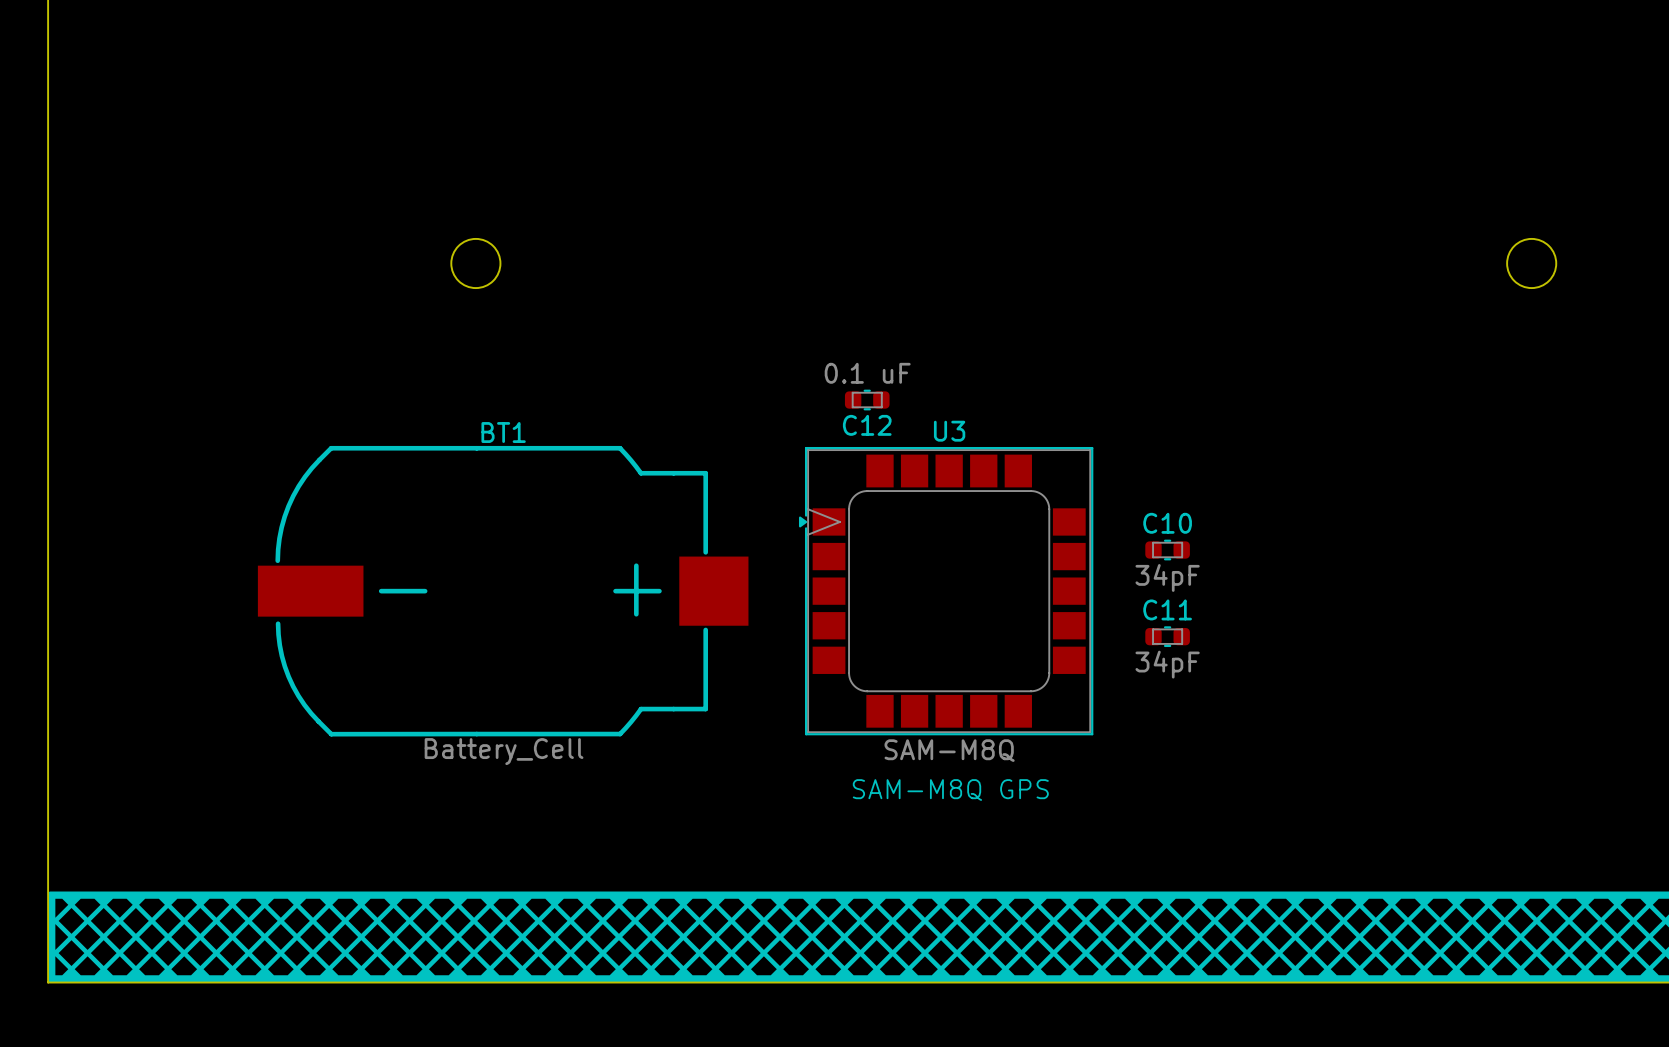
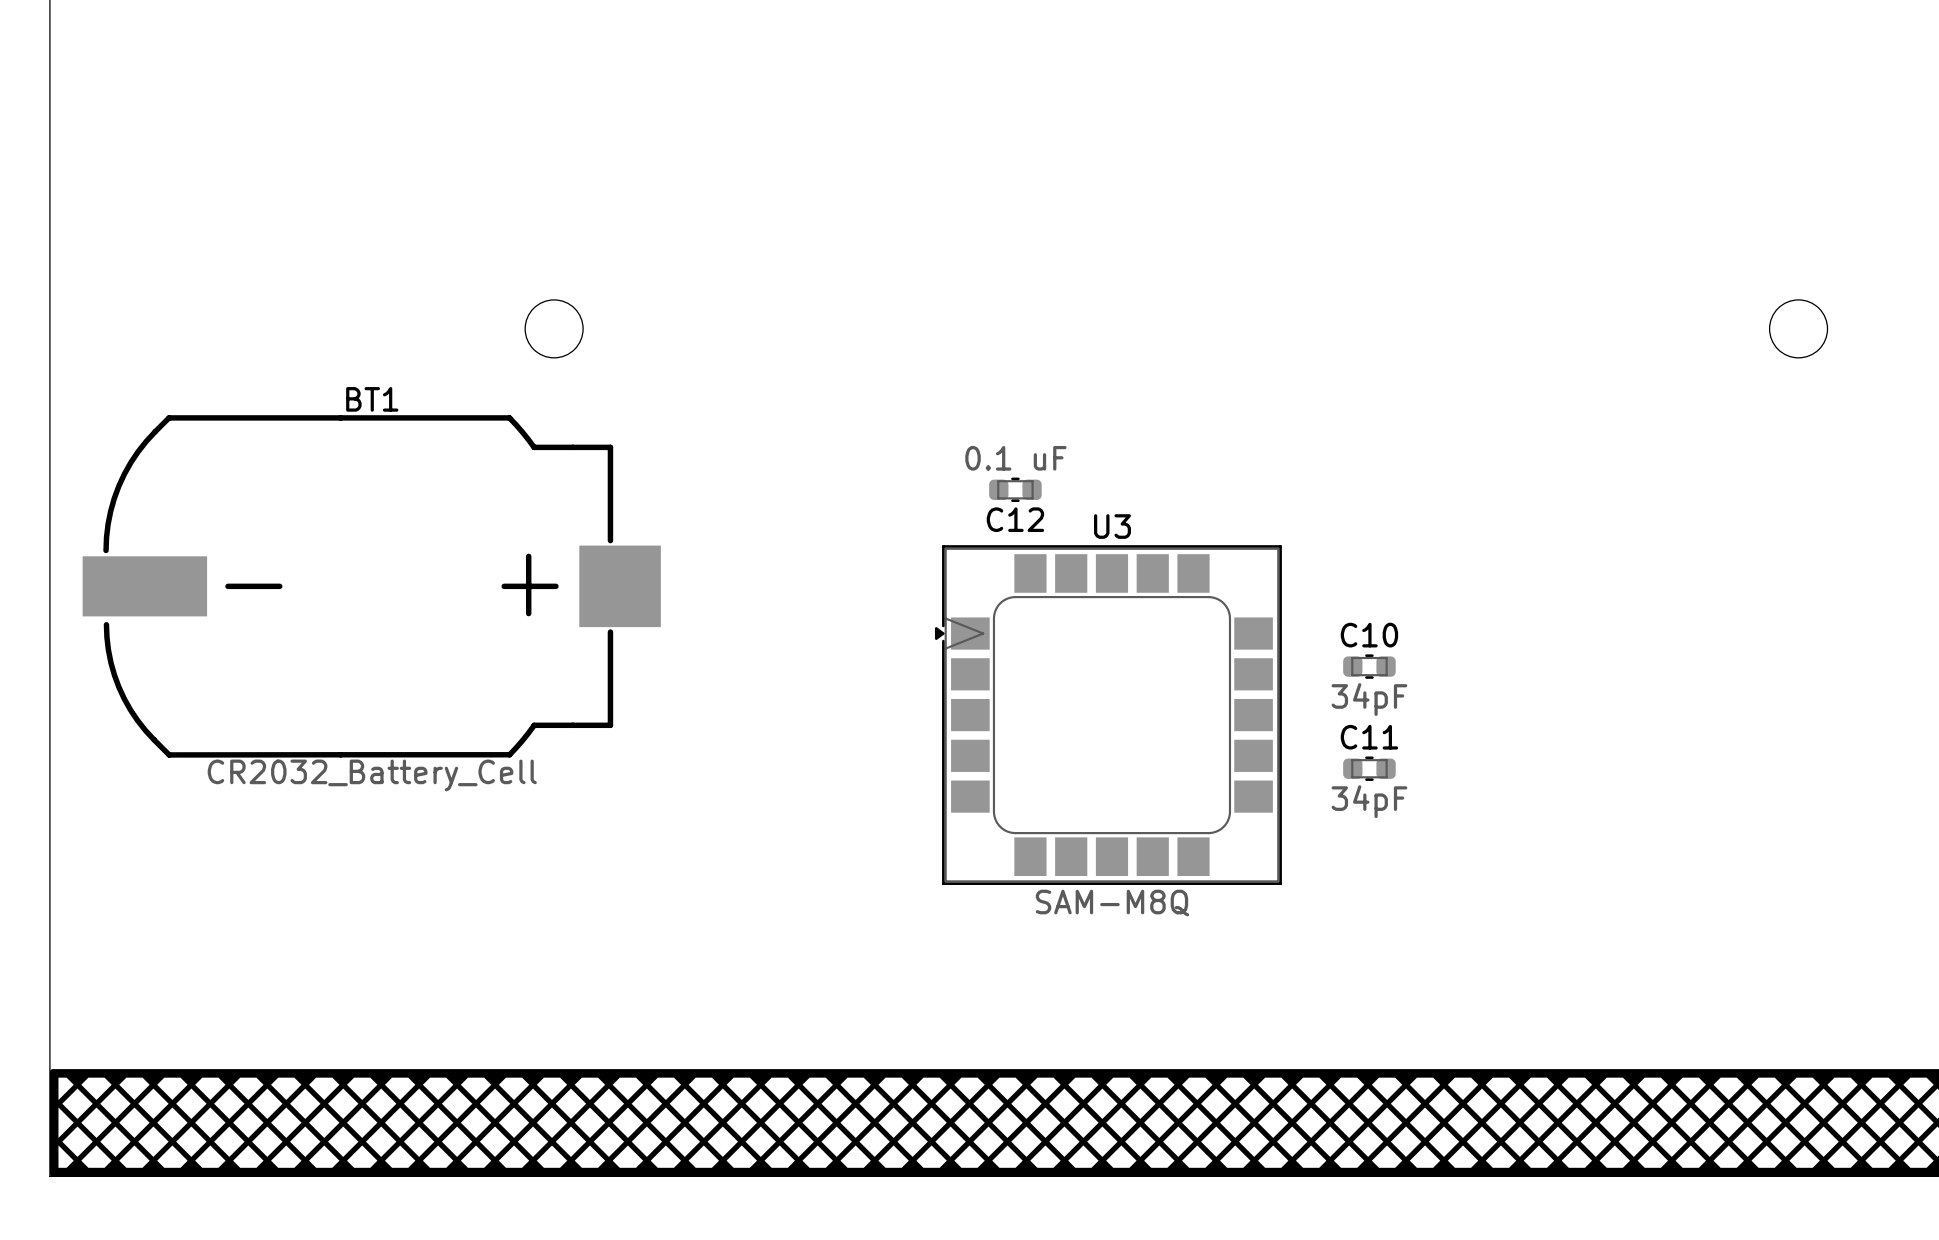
BT1 position: (503, 591) -> (371, 586)
BT1 value: Battery_Cell (504, 751) -> CR2032_Battery_Cell (372, 775)
text: SAM-M8Q GPS (950, 790) -> none

